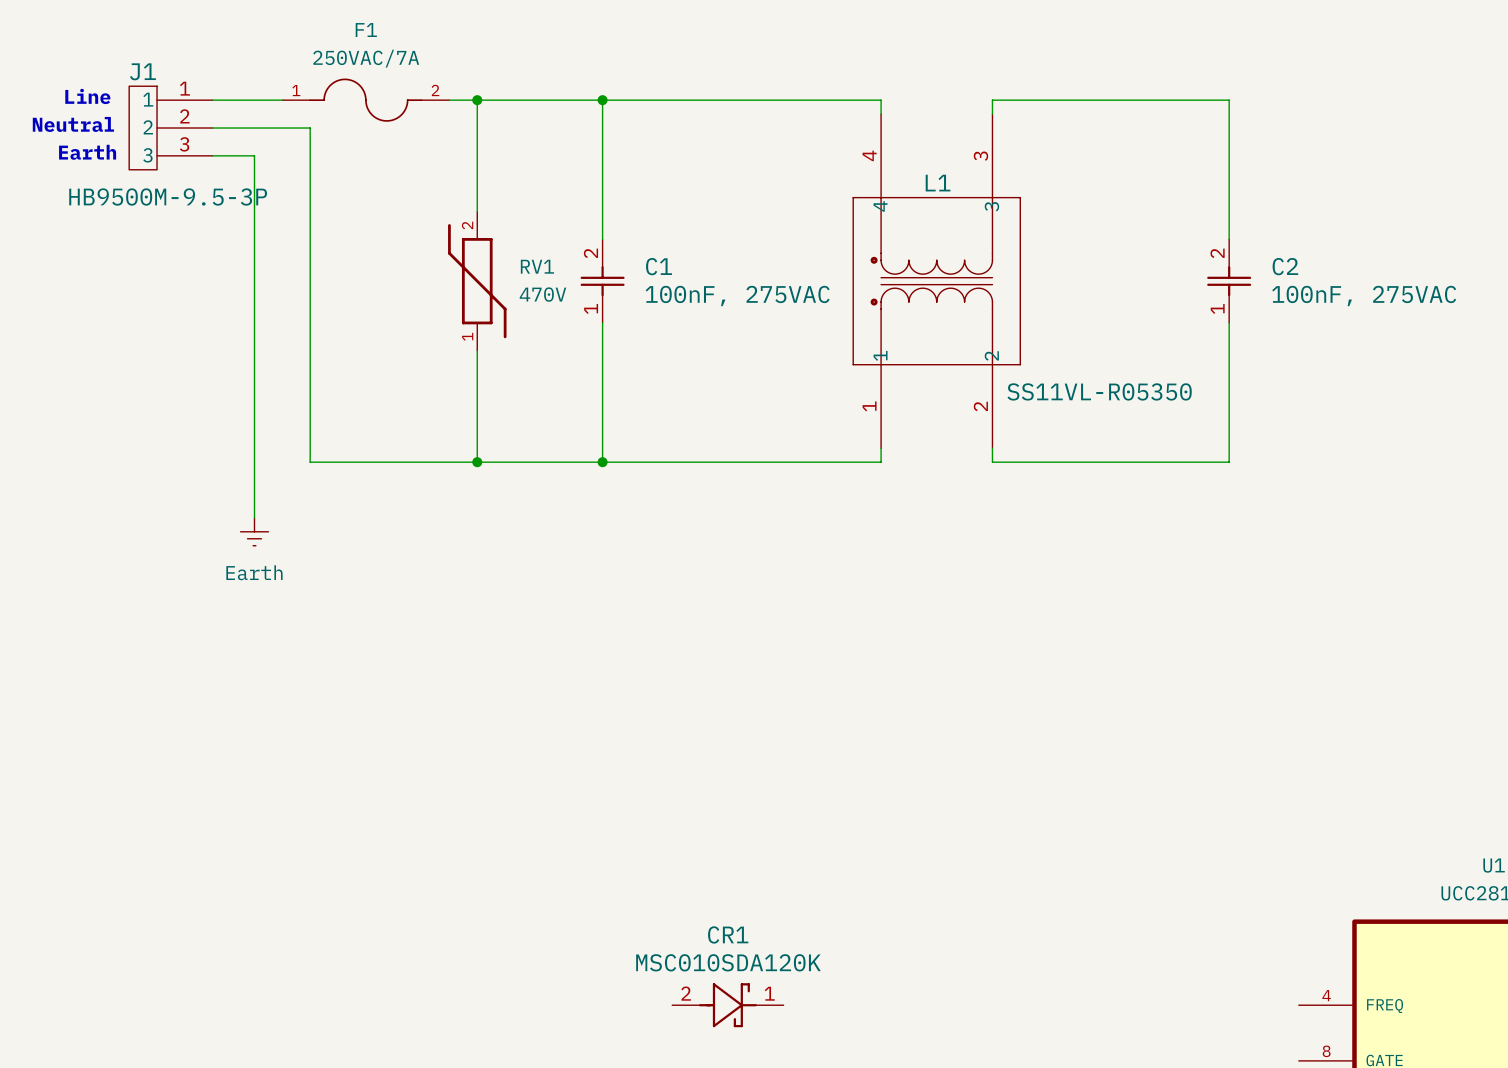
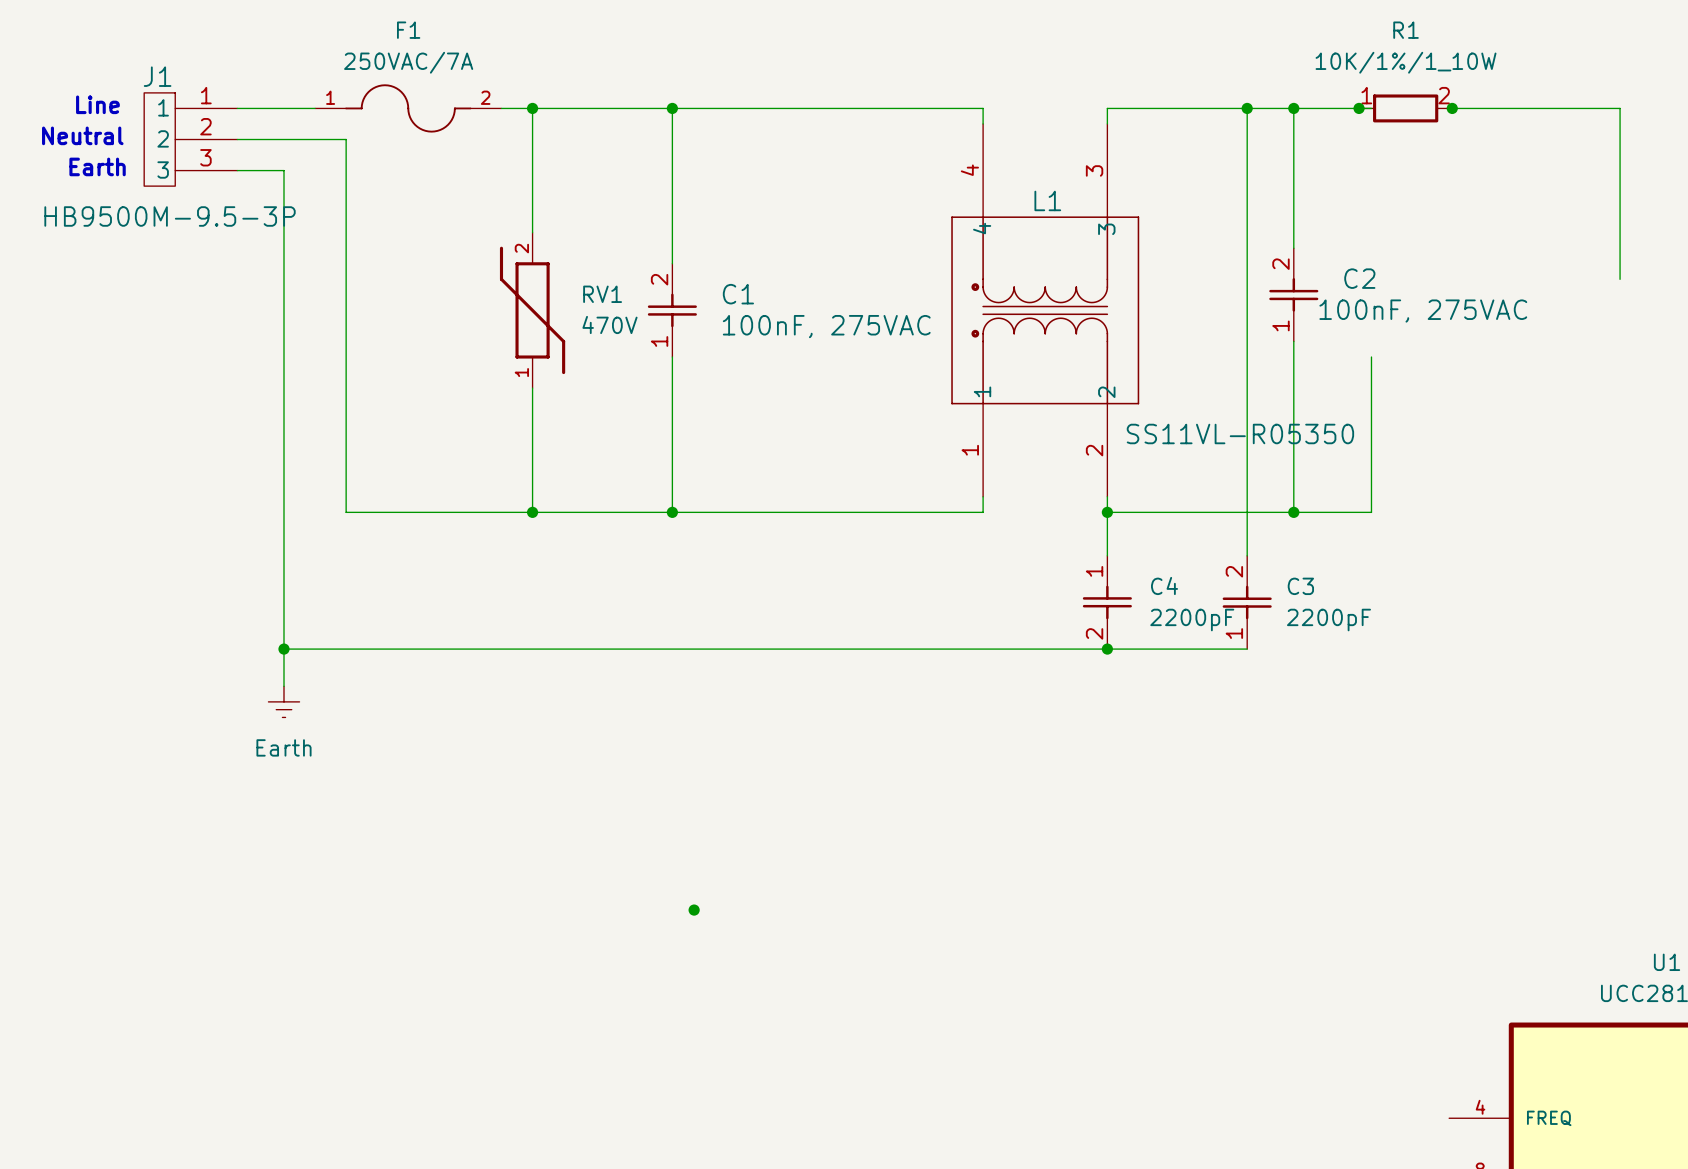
wire: none -> (1247, 108) (1247, 555)
junction: none -> (1247, 108)
wire: none -> (1293, 108) (1293, 248)
junction: none -> (1293, 108)
junction: none -> (1359, 108)
wire: (1229, 100) (1229, 239) -> none
R1: none -> 10K/1%/1_10W (1405, 108)
wire: none -> (1449, 108) (1620, 108) (1620, 279)
junction: none -> (1452, 108)
C2 position: (1229, 281) -> (1293, 294)
C2 value position: 100nF, 275VAC (1364, 296) -> 100nF, 275VAC (1423, 311)
wire: none -> (1293, 341) (1293, 512)
wire: none -> (1107, 512) (1107, 555)
junction: none -> (1107, 512)
junction: none -> (1293, 512)
wire: none -> (283, 574) (283, 686)
power symbol position: Earth (254, 531) -> Earth (283, 701)
C4: none -> 2200pF (1107, 602)
C3: none -> 2200pF (1247, 602)
wire: none -> (283, 649) (1247, 649)
junction: none -> (283, 649)
junction: none -> (1107, 649)
junction: none -> (694, 910)
CR1: MSC010SDA120K (727, 1005) -> none

